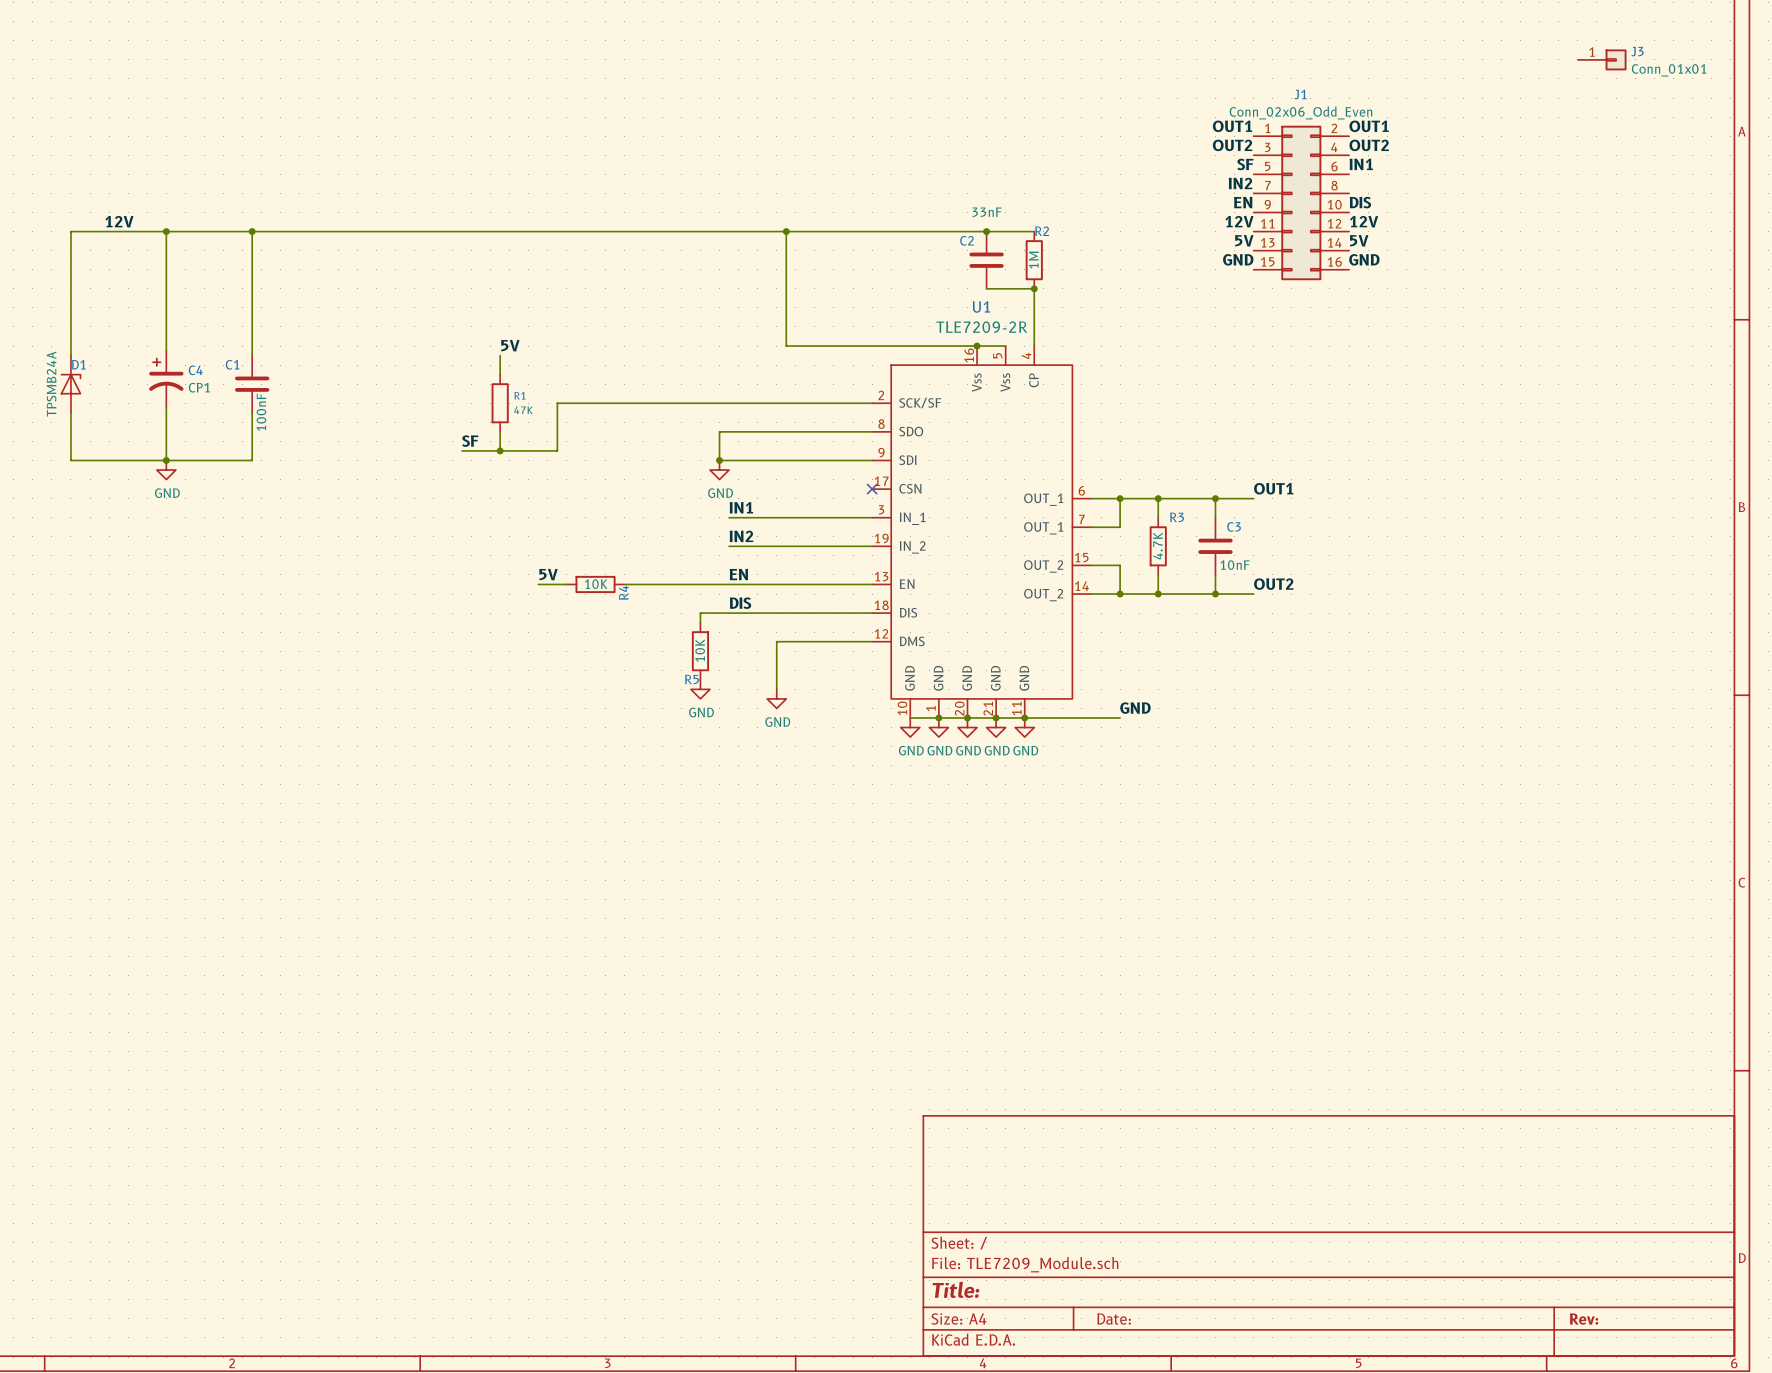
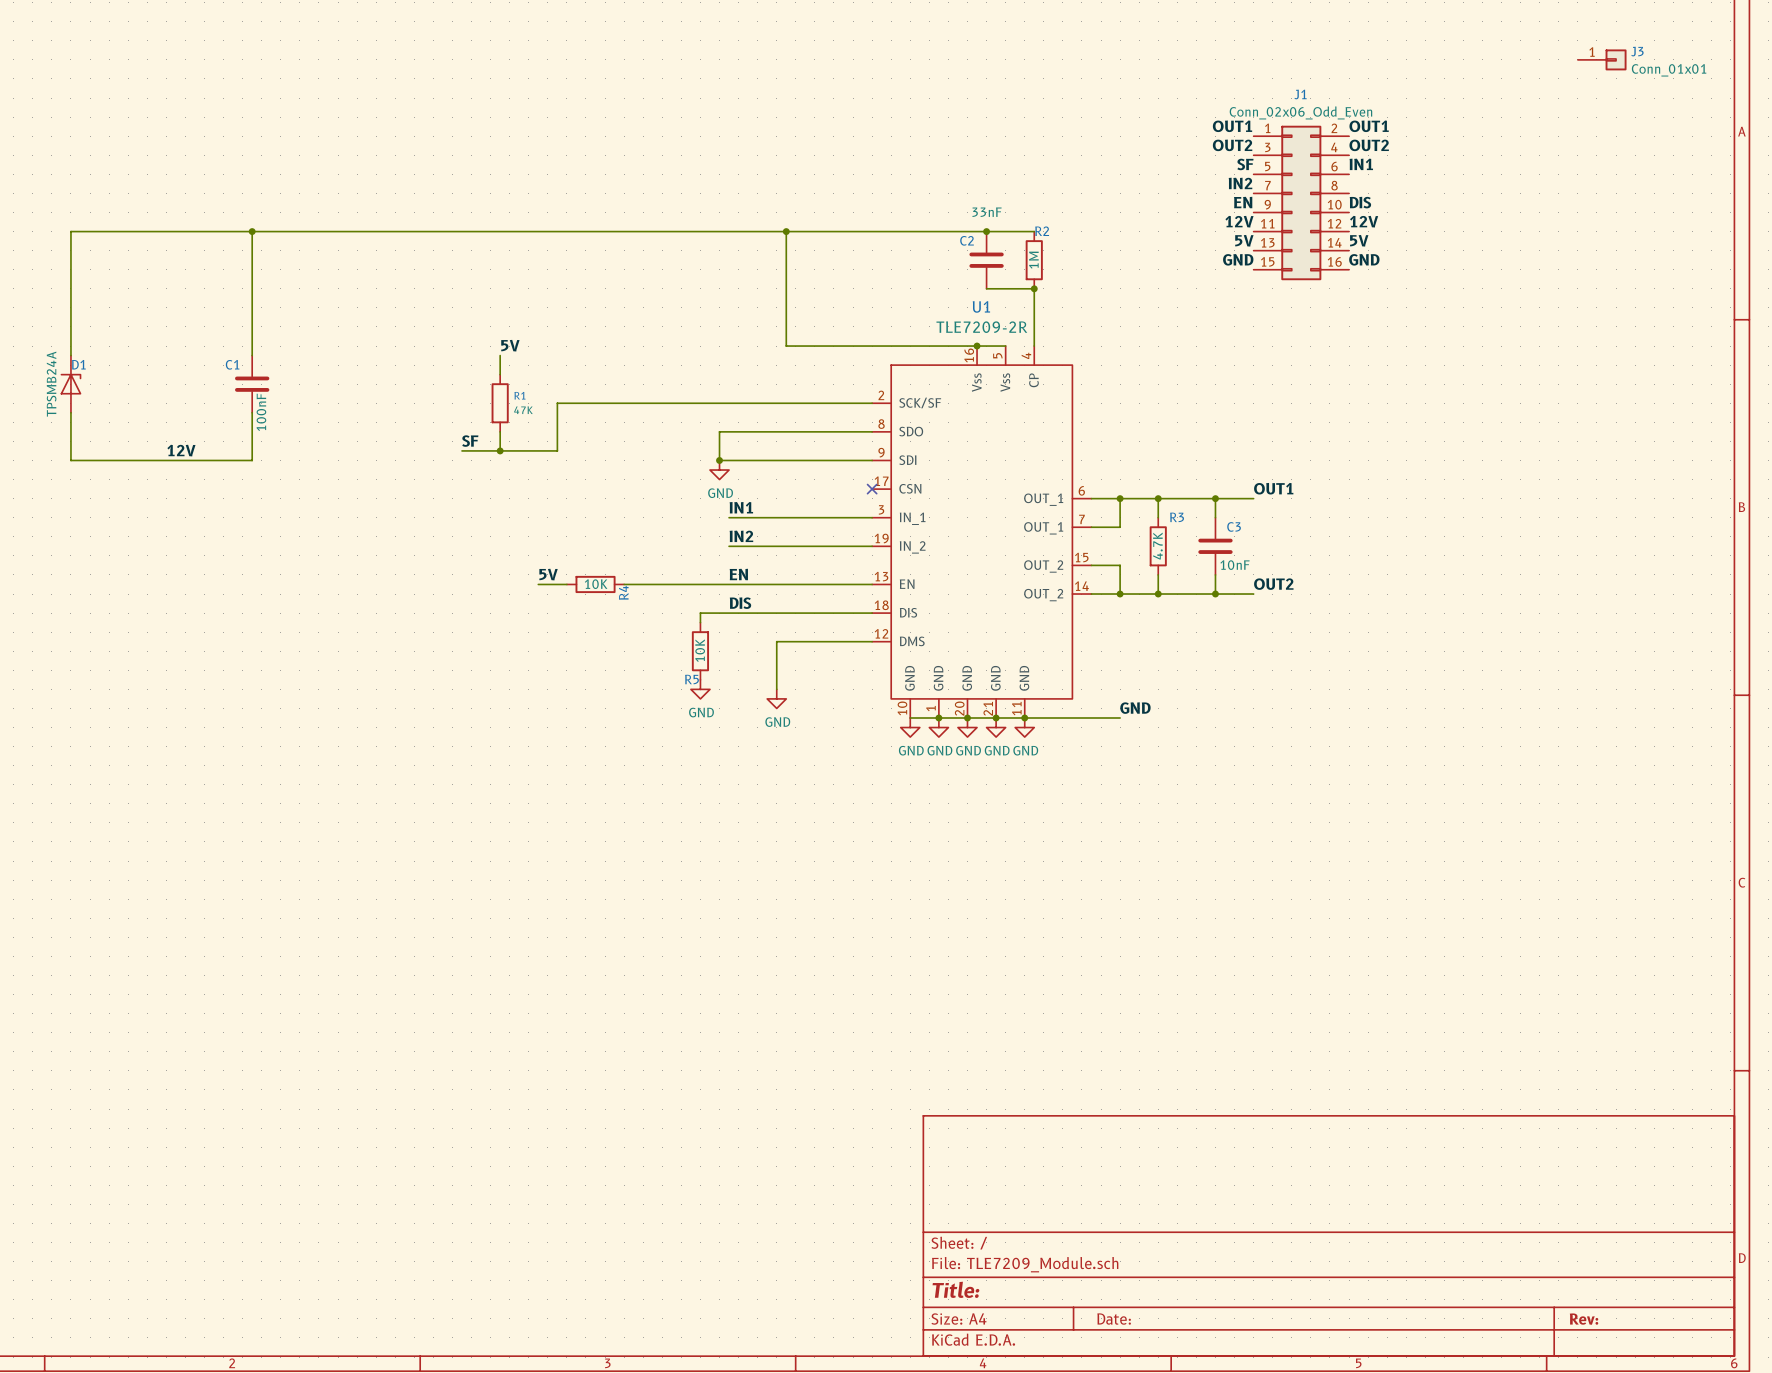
label: 12V (119, 221) -> none
wire: (166, 231) (166, 350) -> none
junction: (166, 231) -> none
C4: CP1 (166, 379) -> none
wire: (166, 408) (166, 460) -> none
label: none -> 12V (181, 450)
junction: (166, 460) -> none
power symbol: GND (166, 470) -> none

